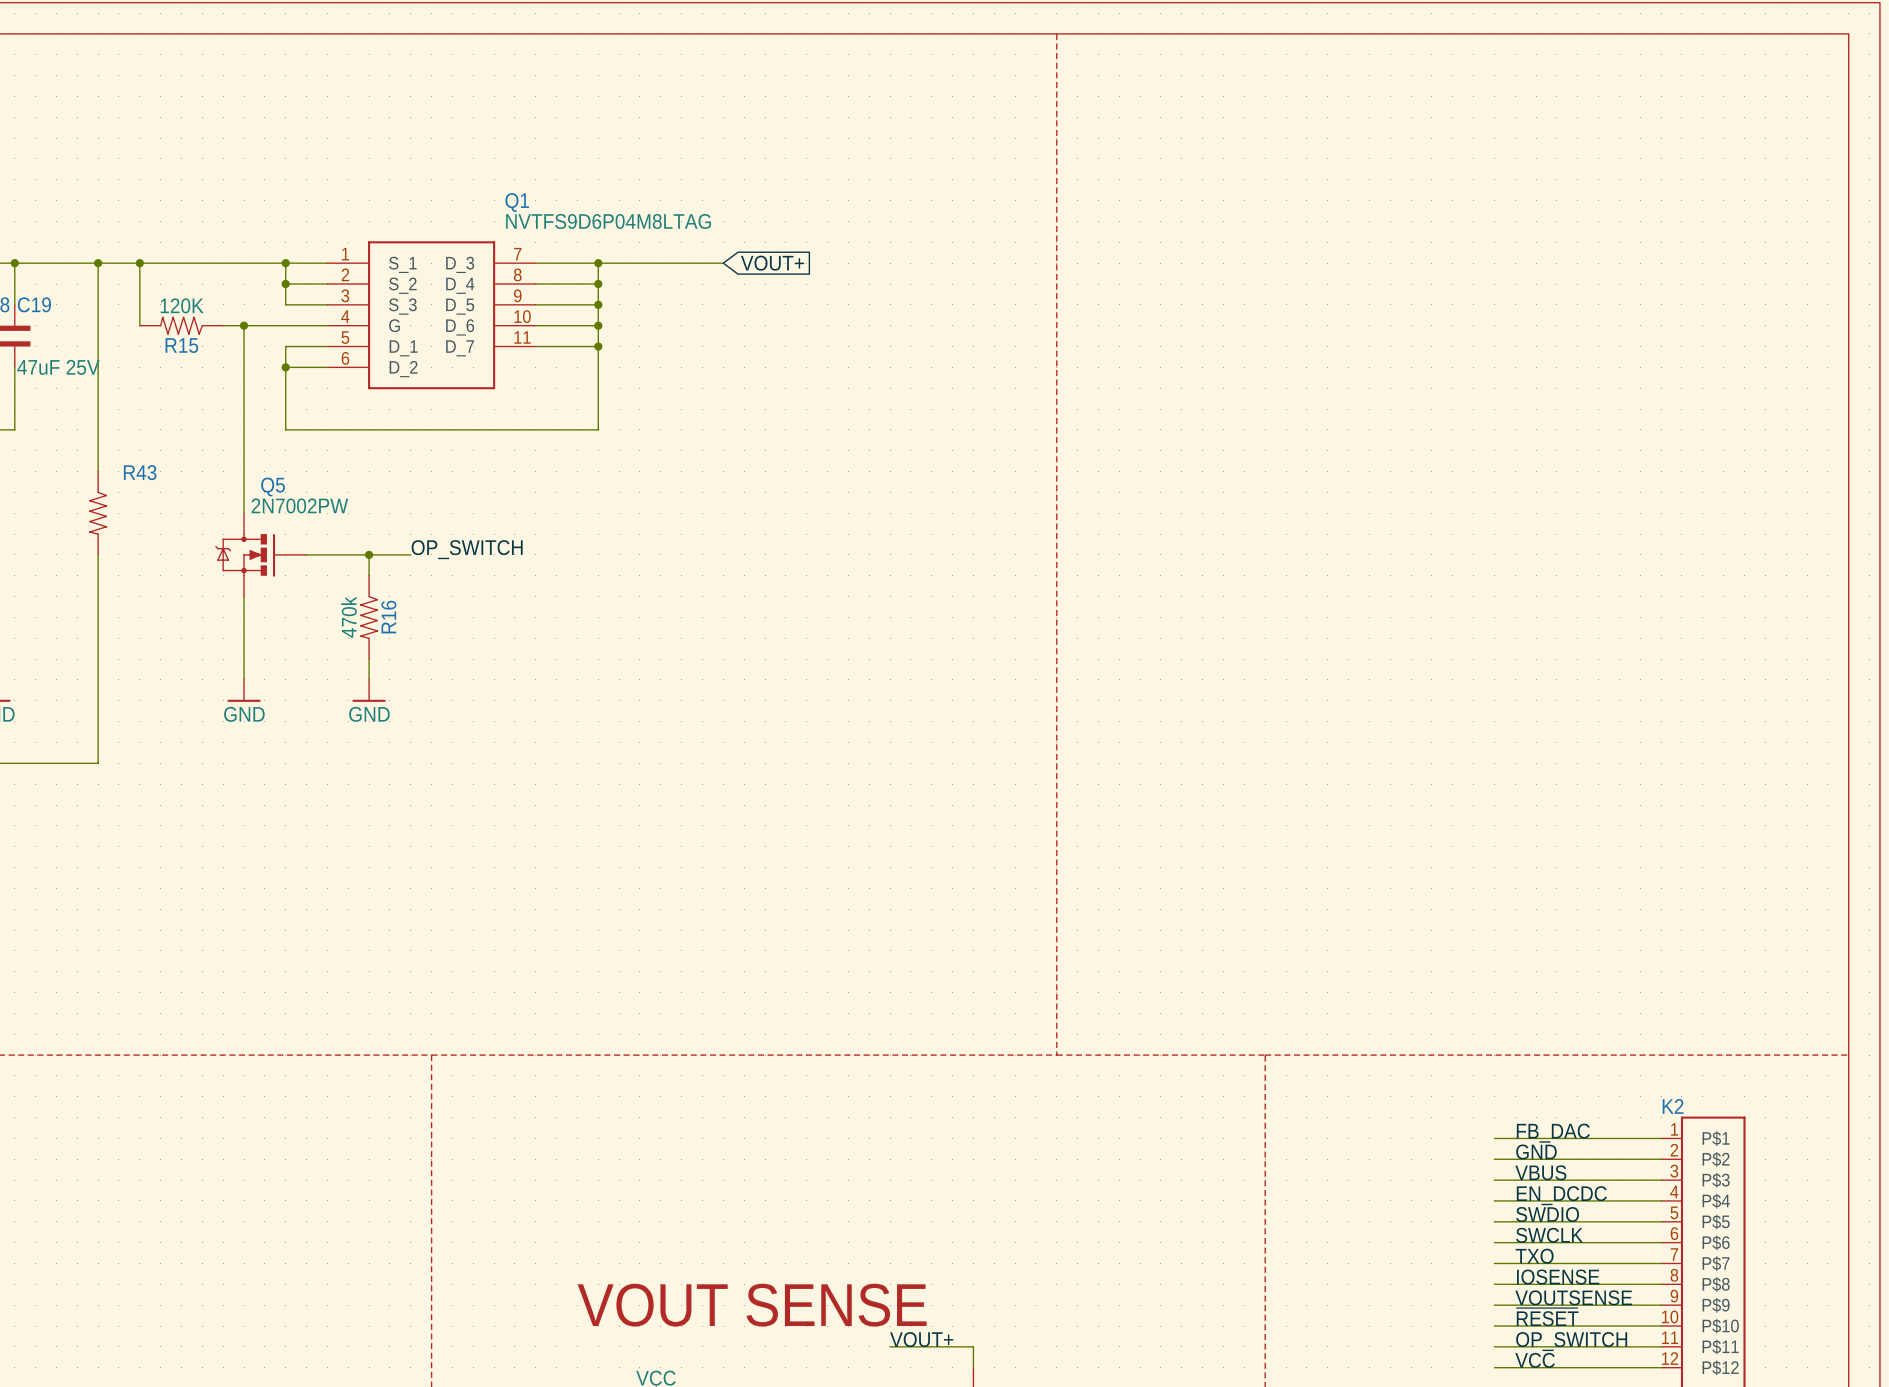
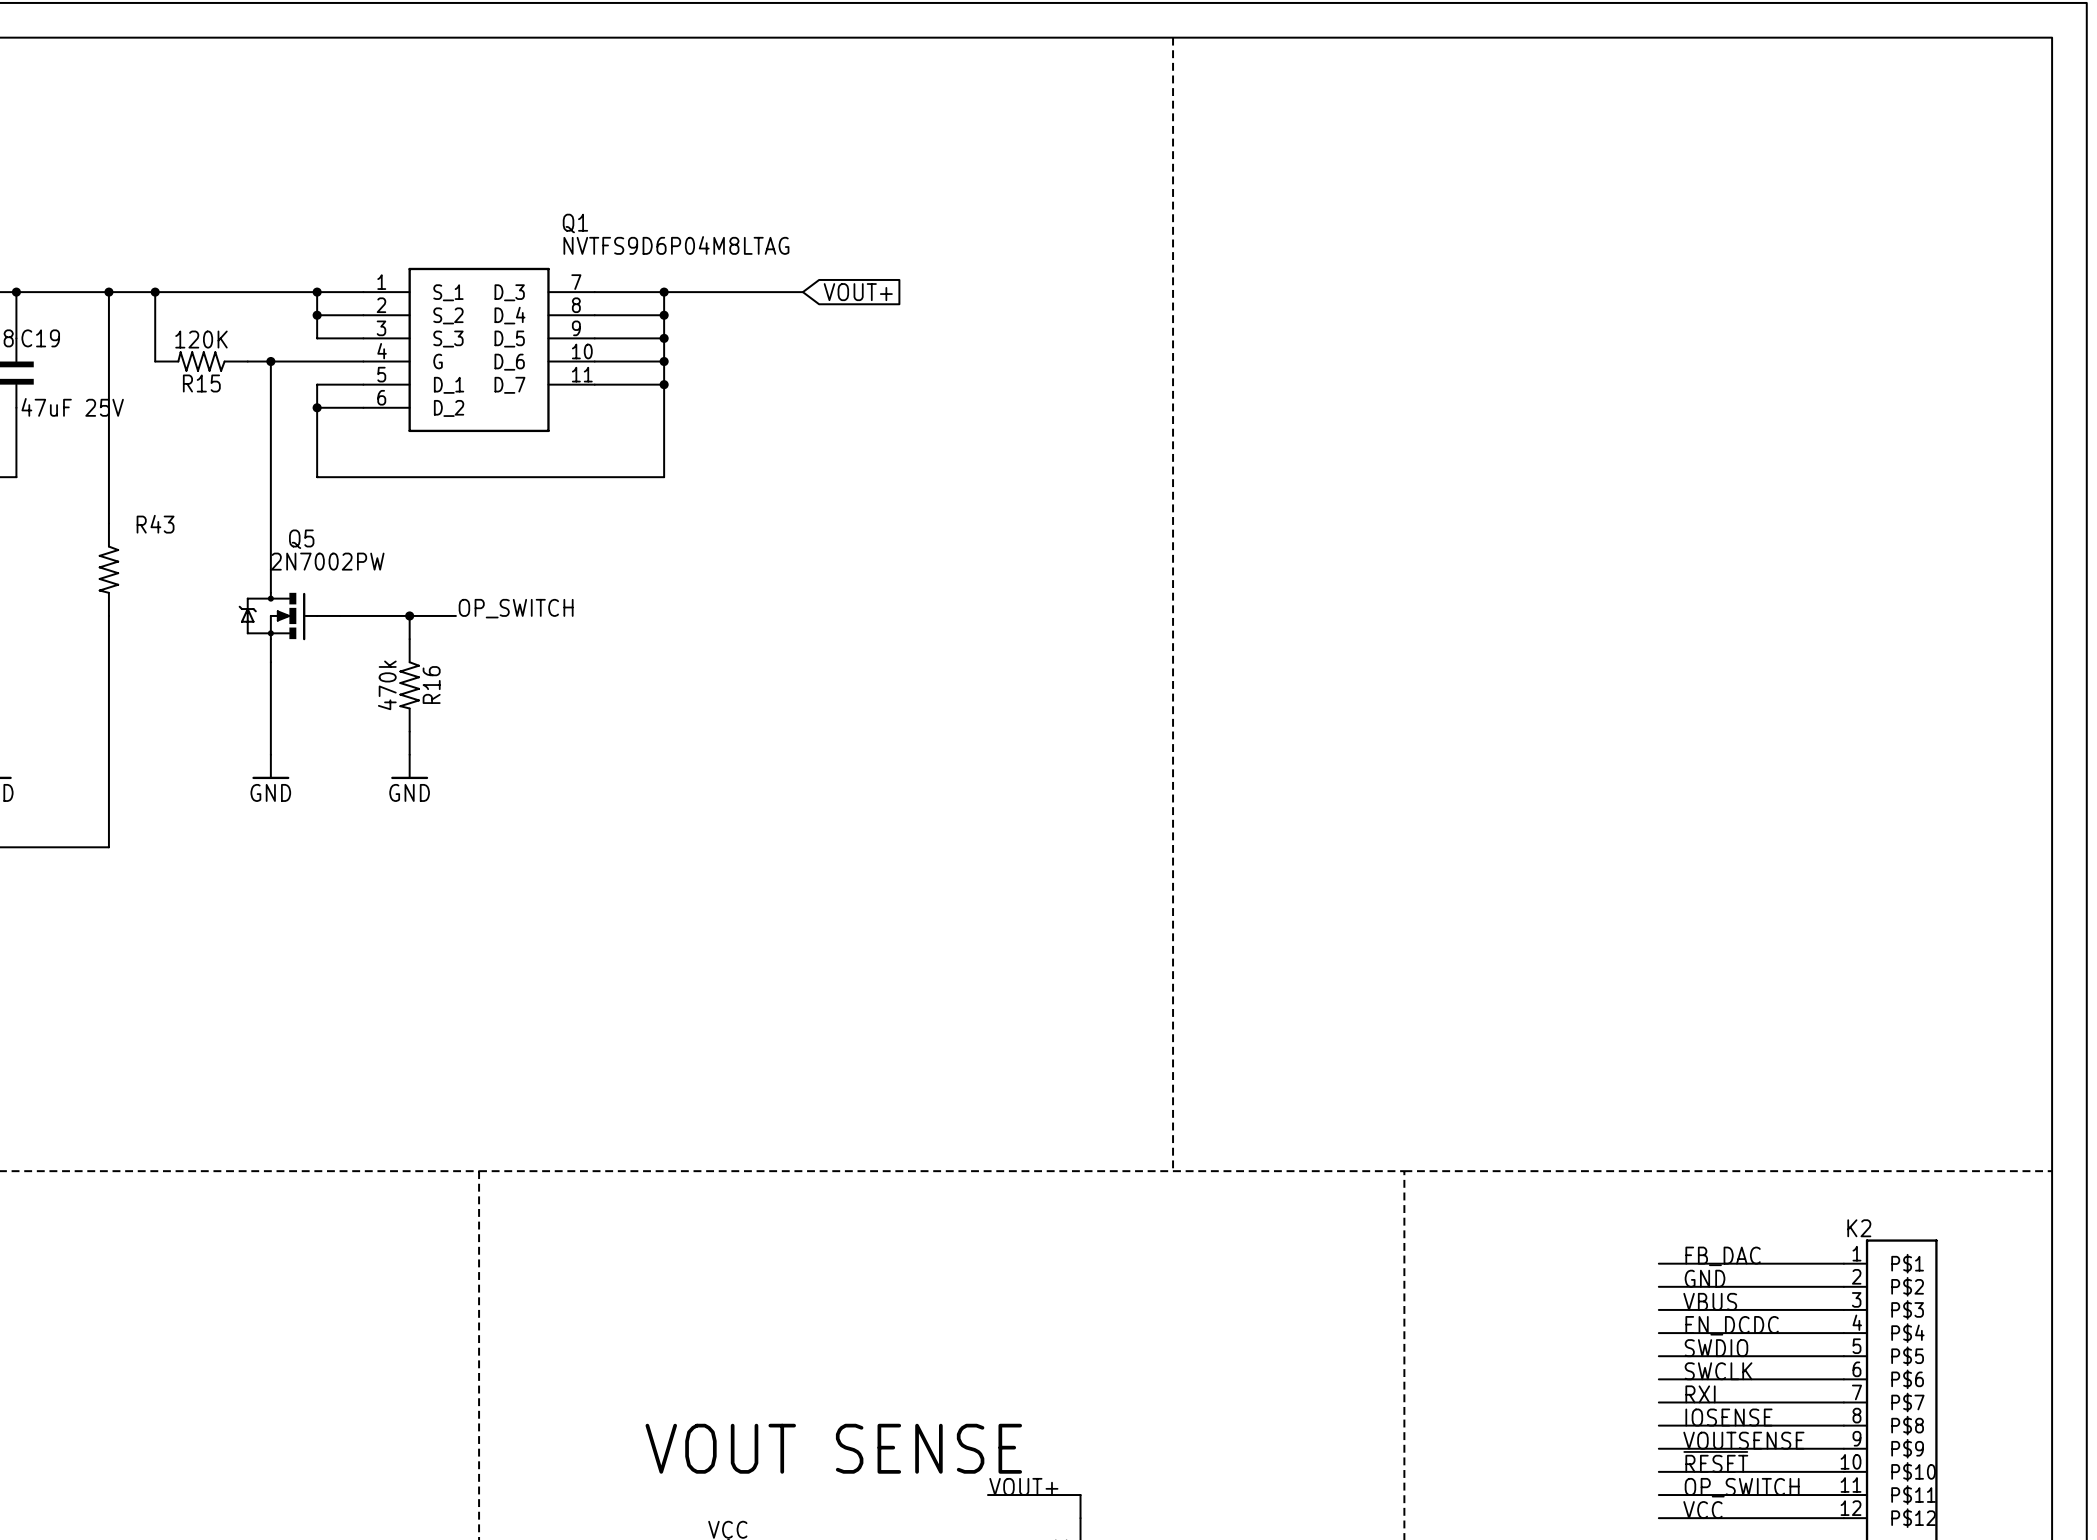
label: TXO (1534, 1256) -> RXI (1700, 1394)

